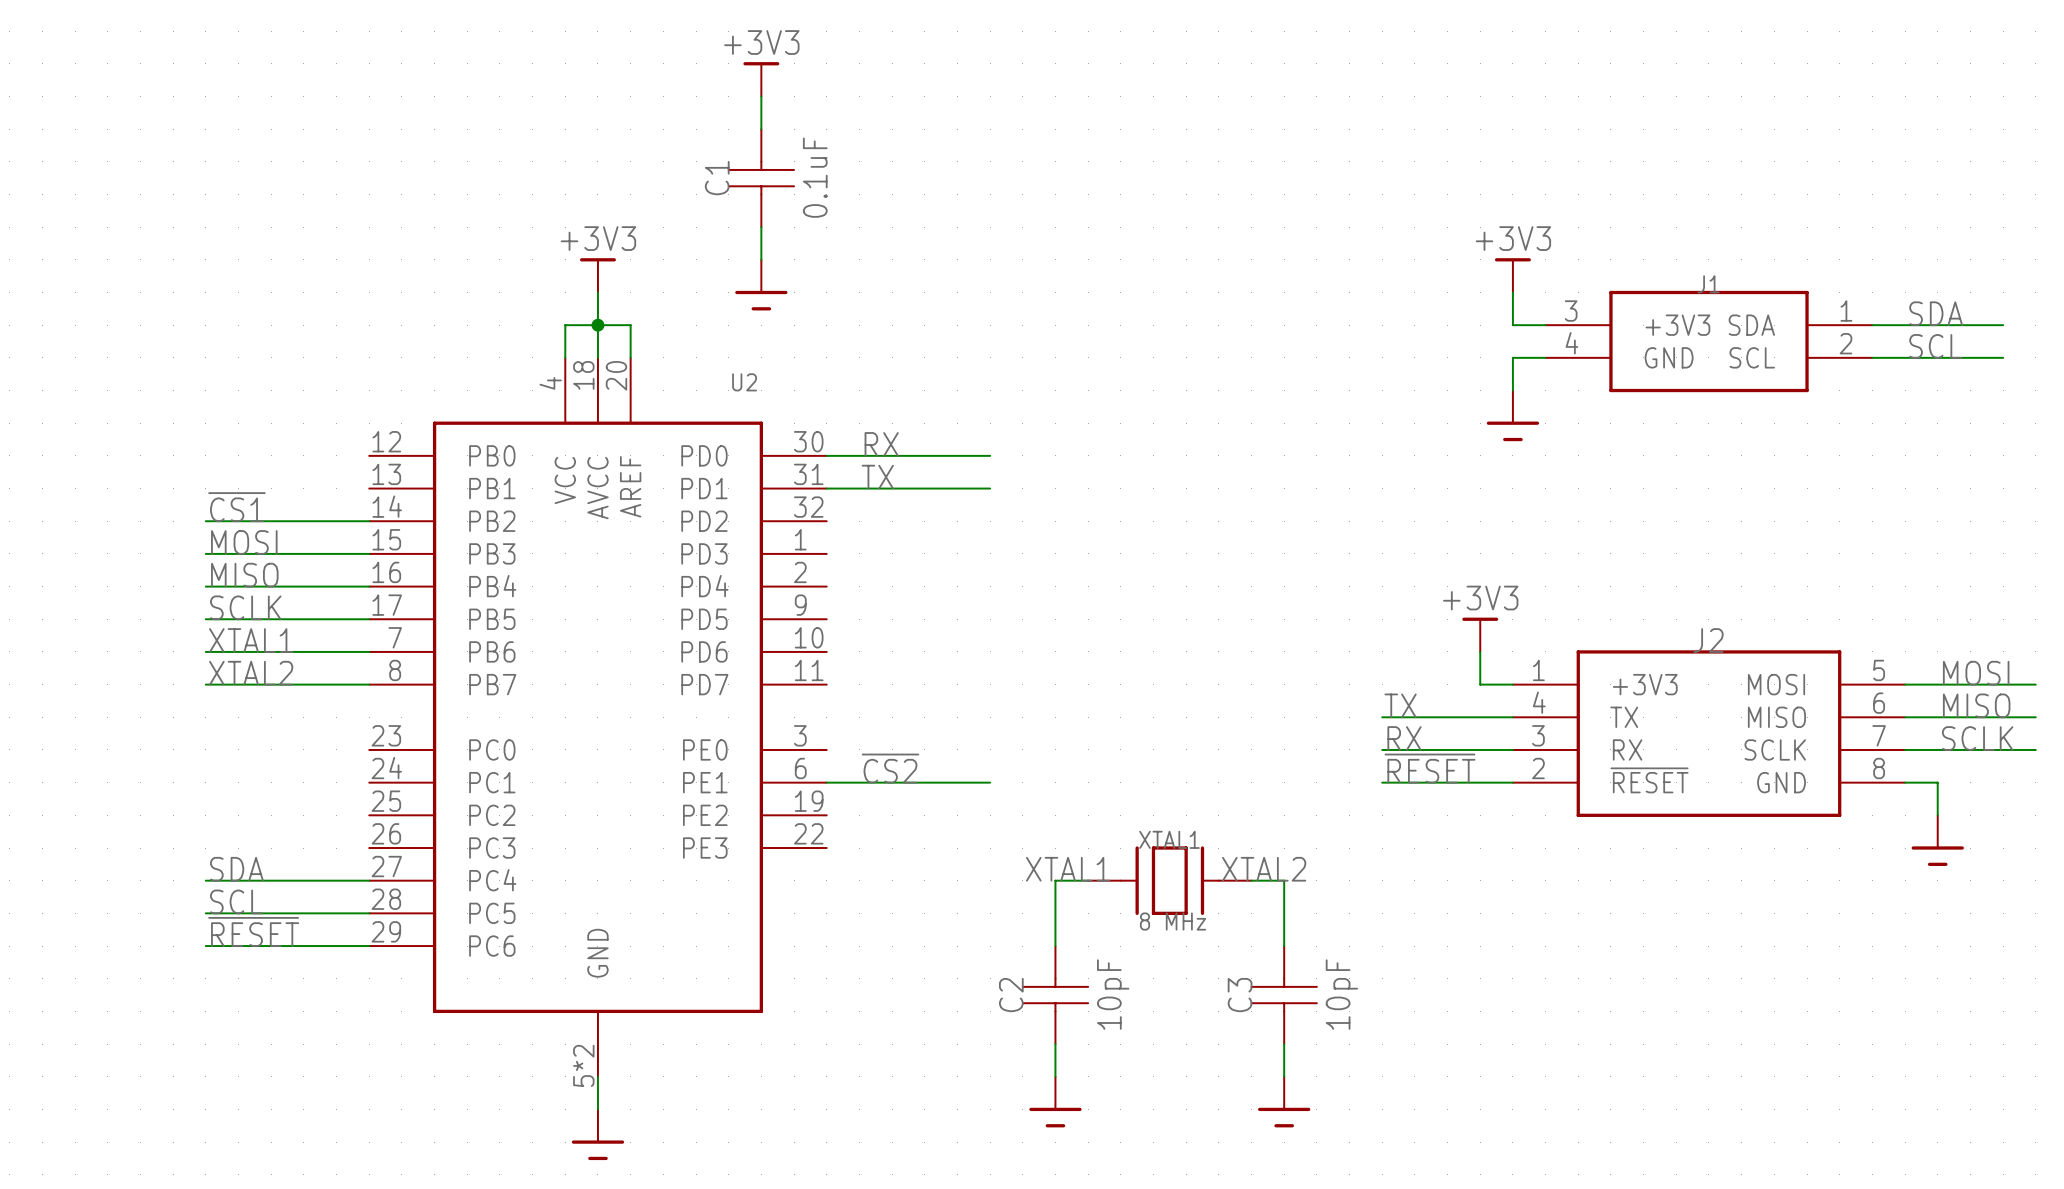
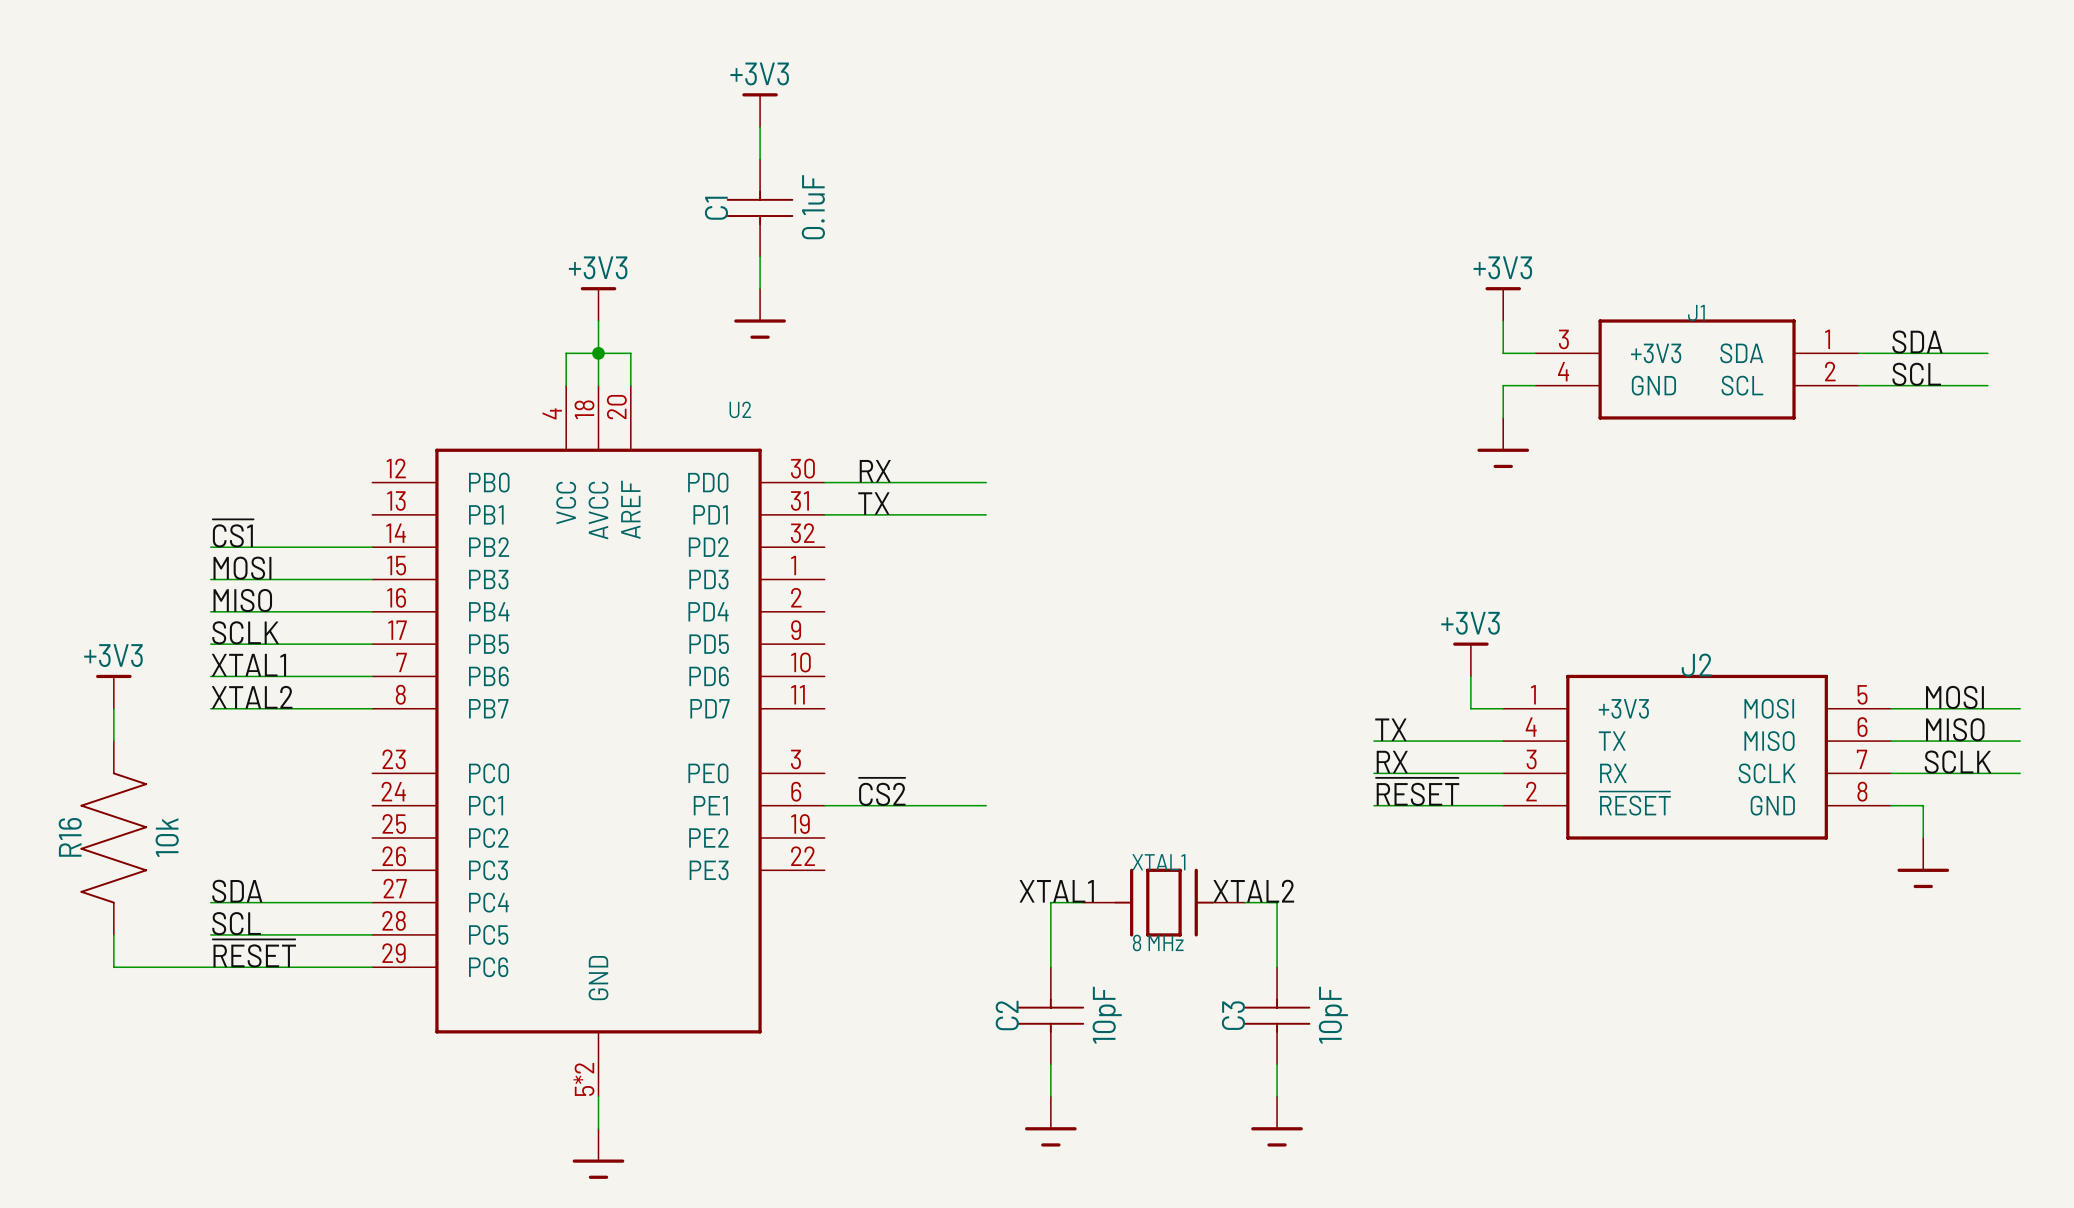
power symbol: none -> +3V3 (113, 691)
wire: none -> (113, 708) (113, 741)
R16: none -> 10k (113, 838)
wire: none -> (113, 934) (113, 967) (210, 967)

